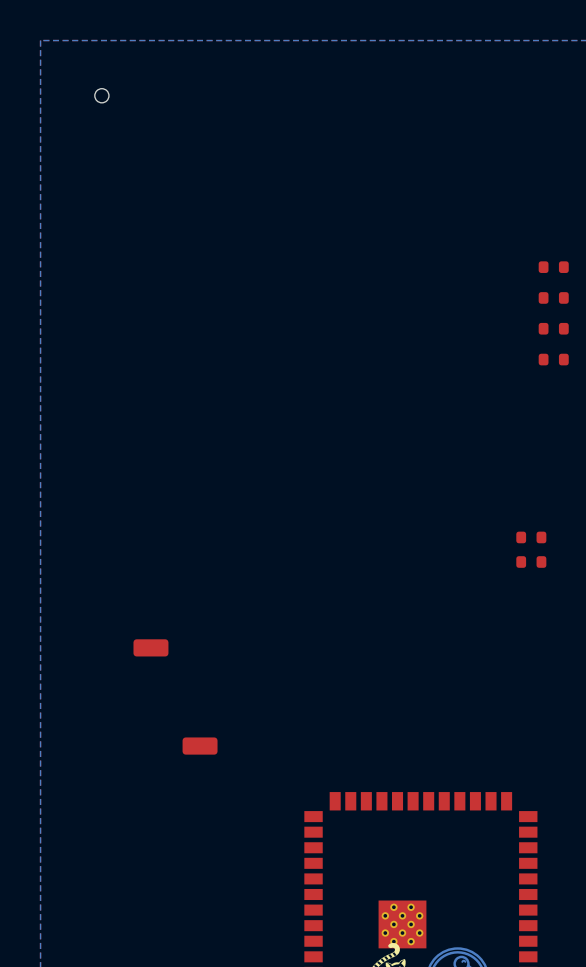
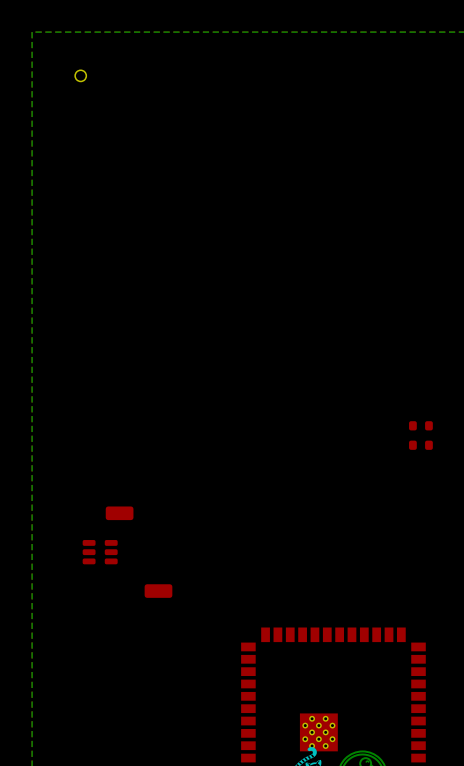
part: (553, 267) -> none
part: (553, 297) -> none
part: (553, 328) -> none
part: (553, 359) -> none
part: none -> (100, 552)

